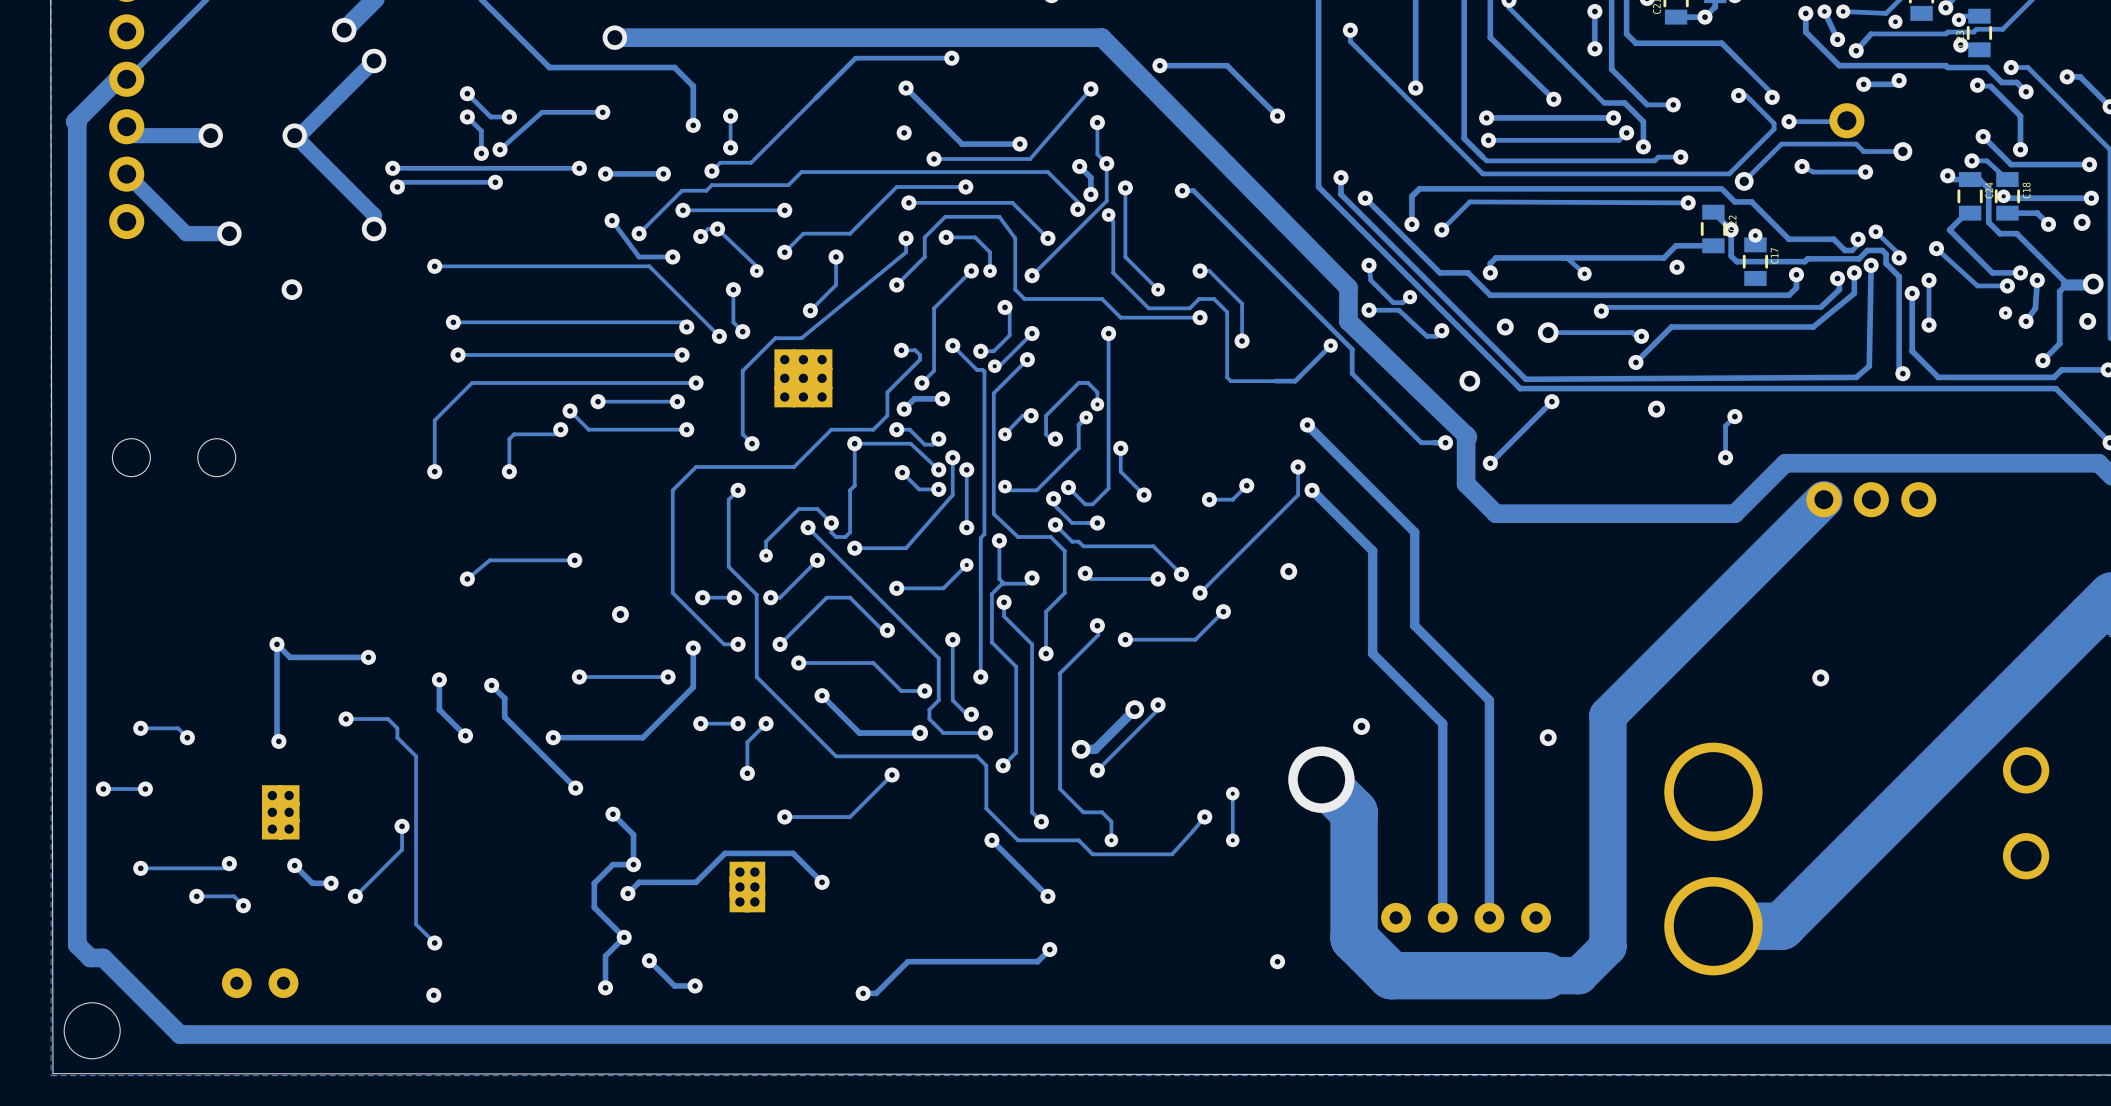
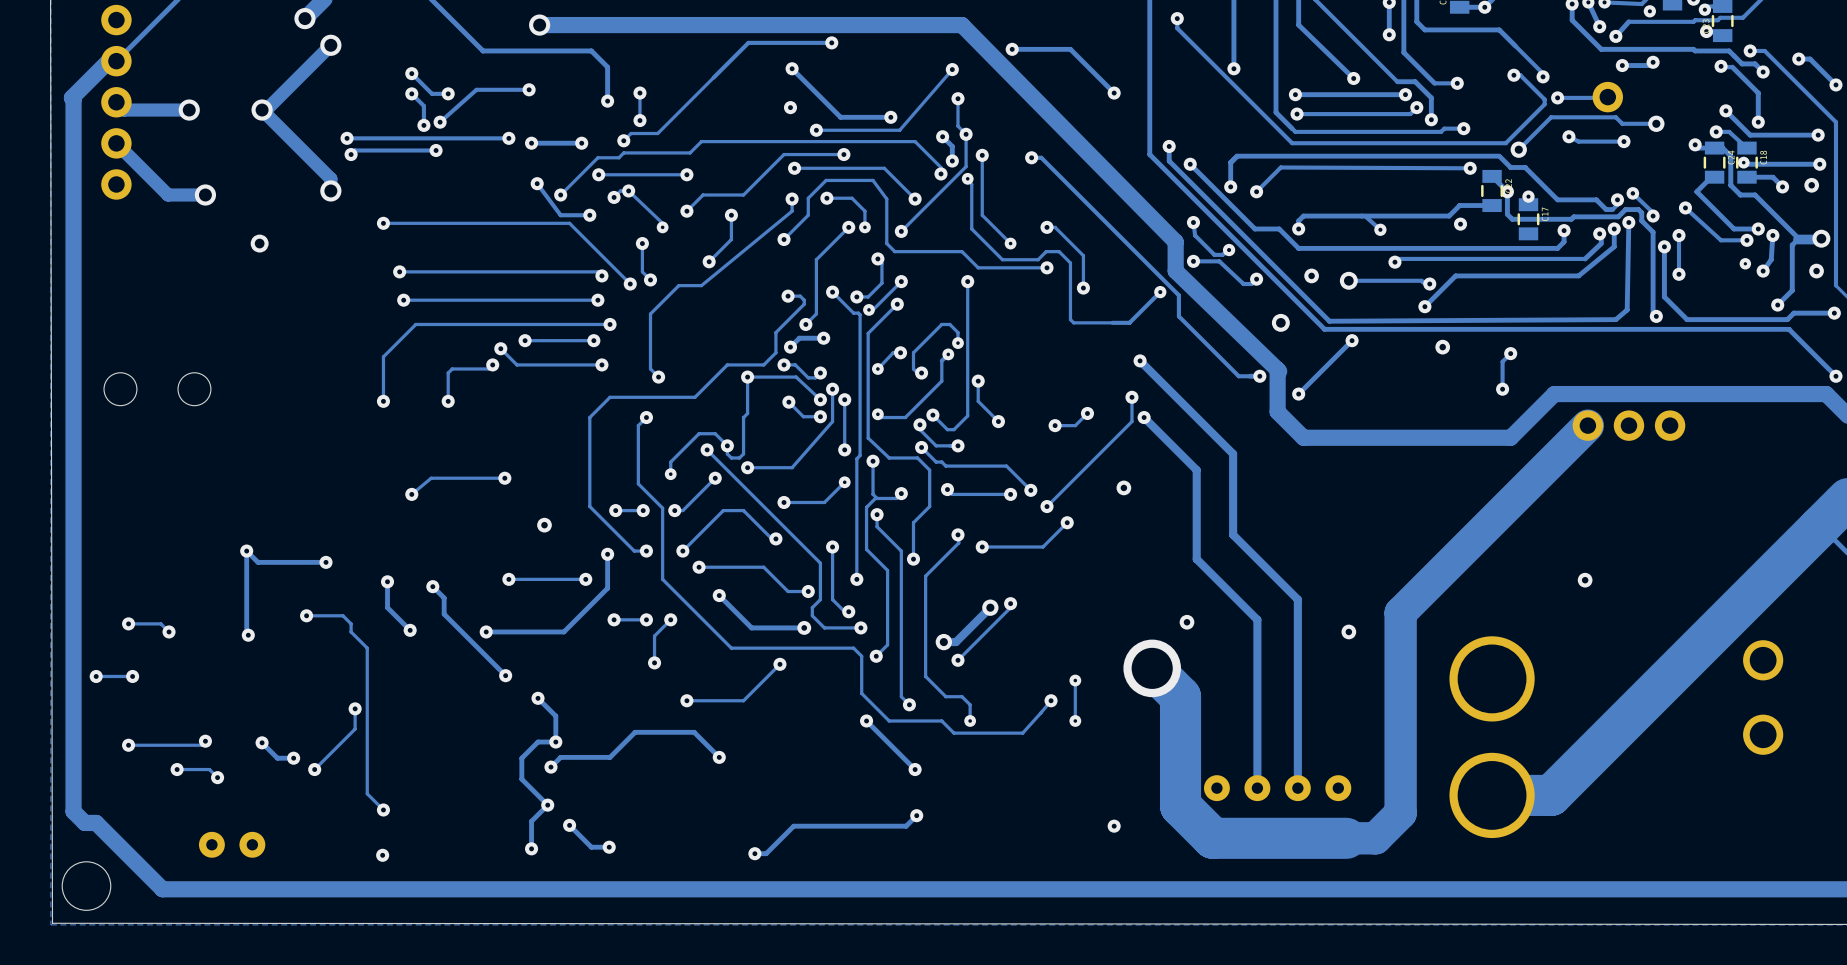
part: (803, 378) -> none
part: (280, 812) -> none
part: (747, 887) -> none

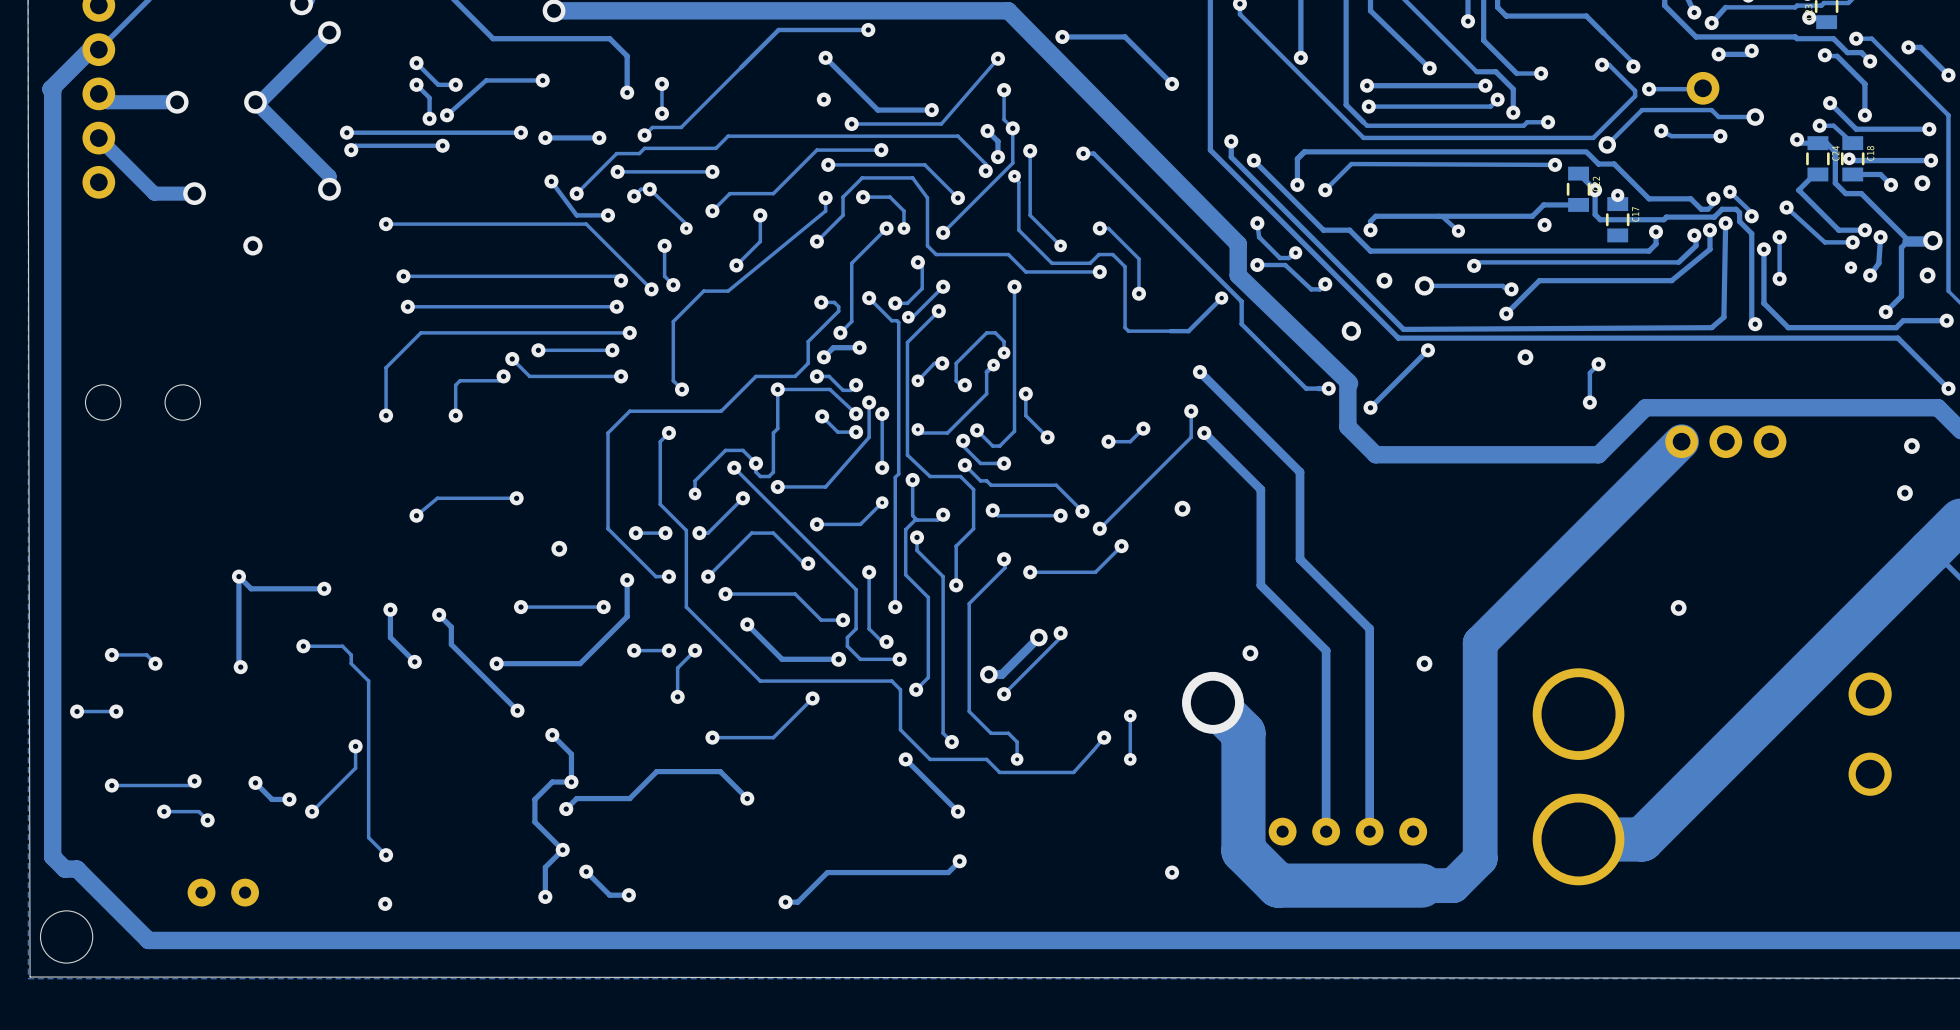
via: none -> (1911, 446)
via: none -> (1904, 493)

